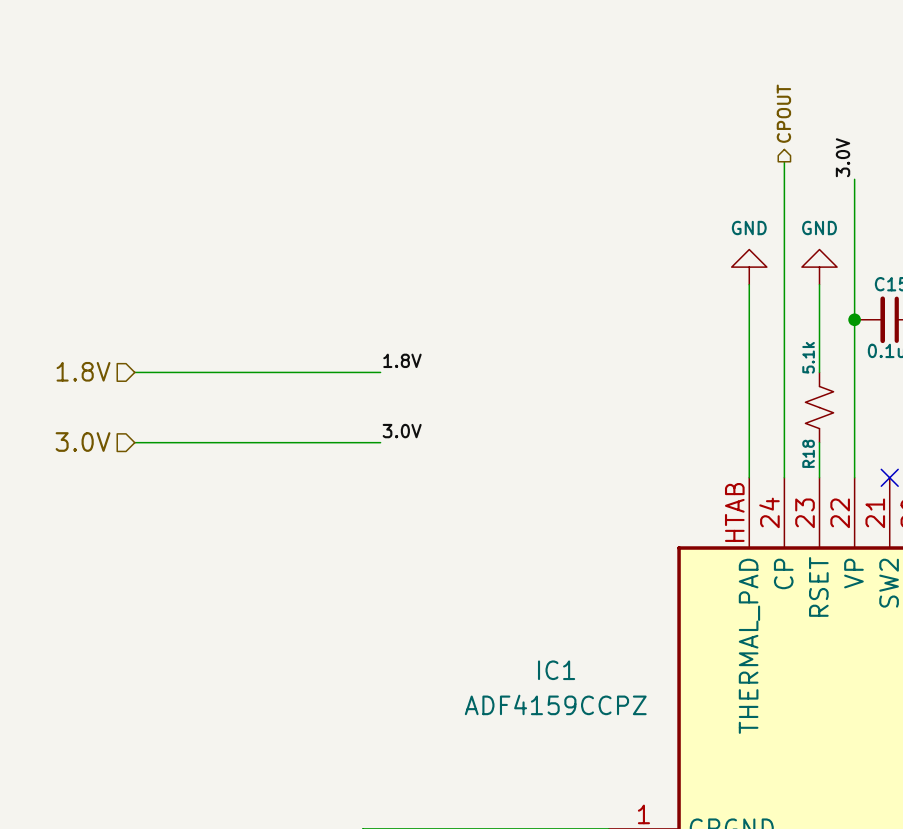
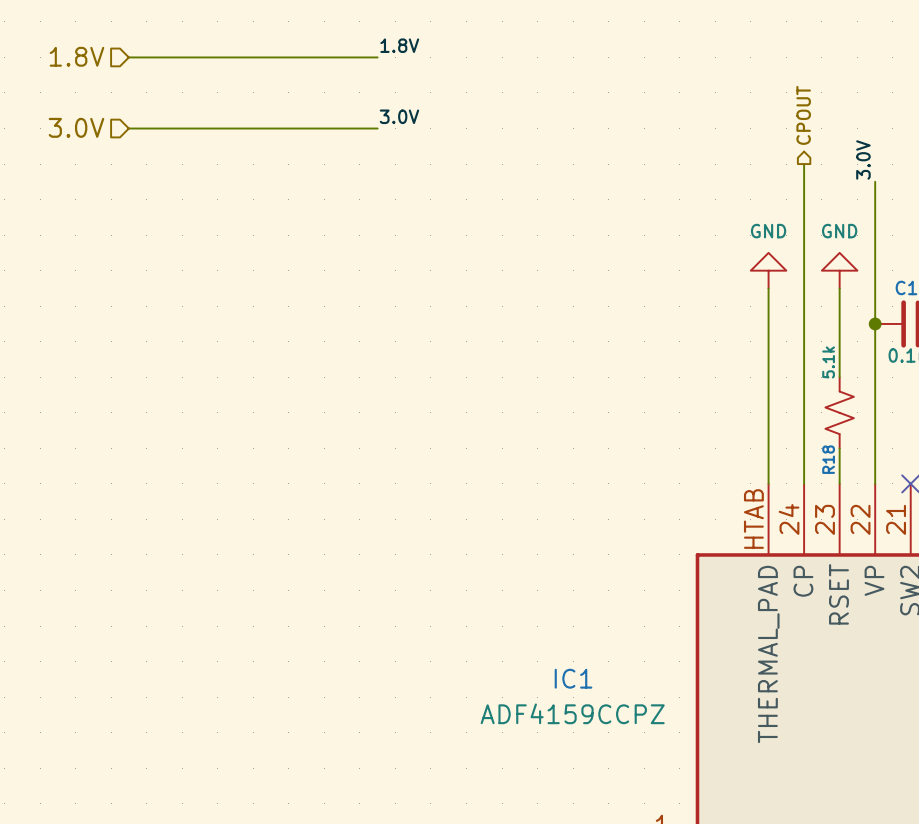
label position: 1.8V (402, 360) -> 1.8V (399, 45)
hierarchical label position: 1.8V (83, 371) -> 1.8V (76, 56)
wire: (134, 372) (380, 372) -> (128, 57) (377, 57)
label position: 3.0V (402, 431) -> 3.0V (399, 116)
hierarchical label position: 3.0V (83, 442) -> 3.0V (76, 127)
wire: (134, 442) (380, 442) -> (128, 128) (377, 128)

